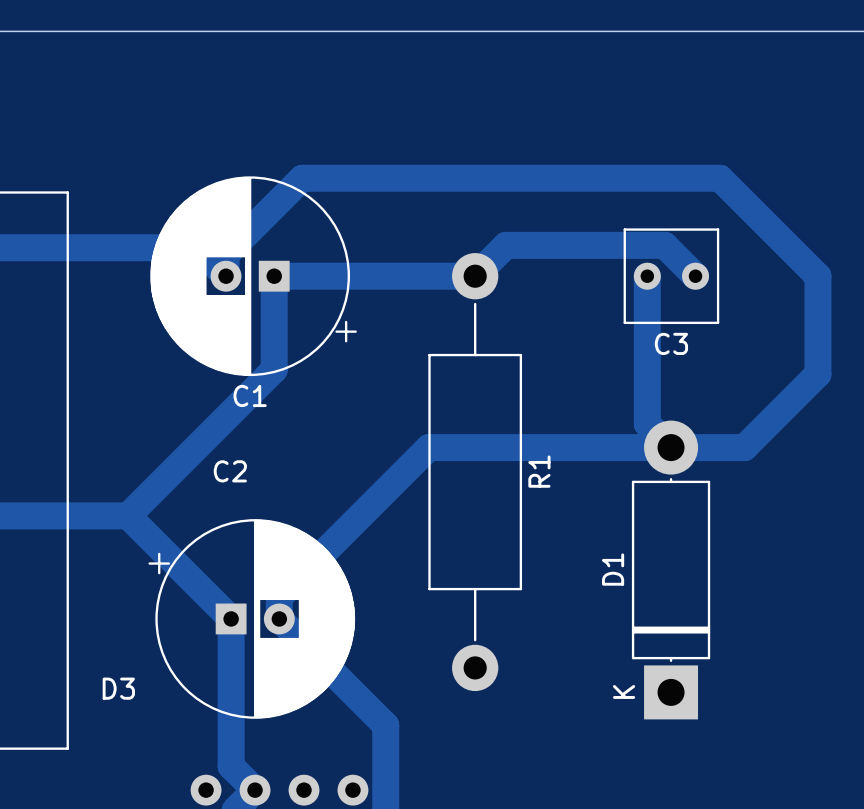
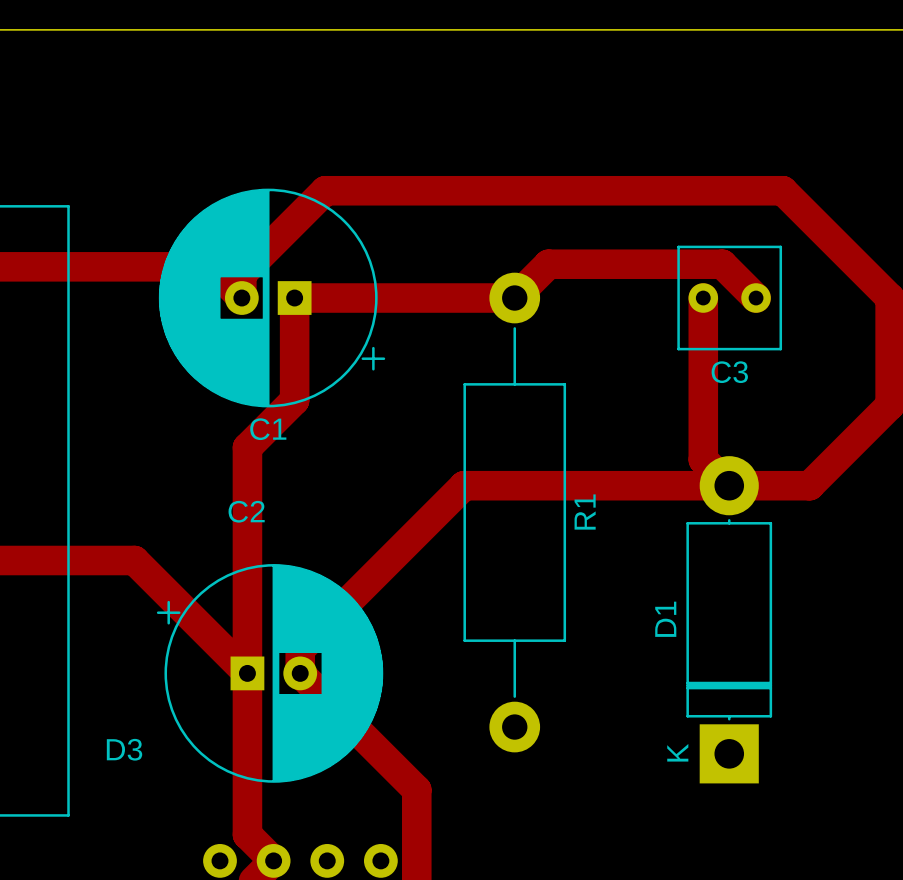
track: (231, 412) (128, 515) -> (247, 447) (247, 673)

